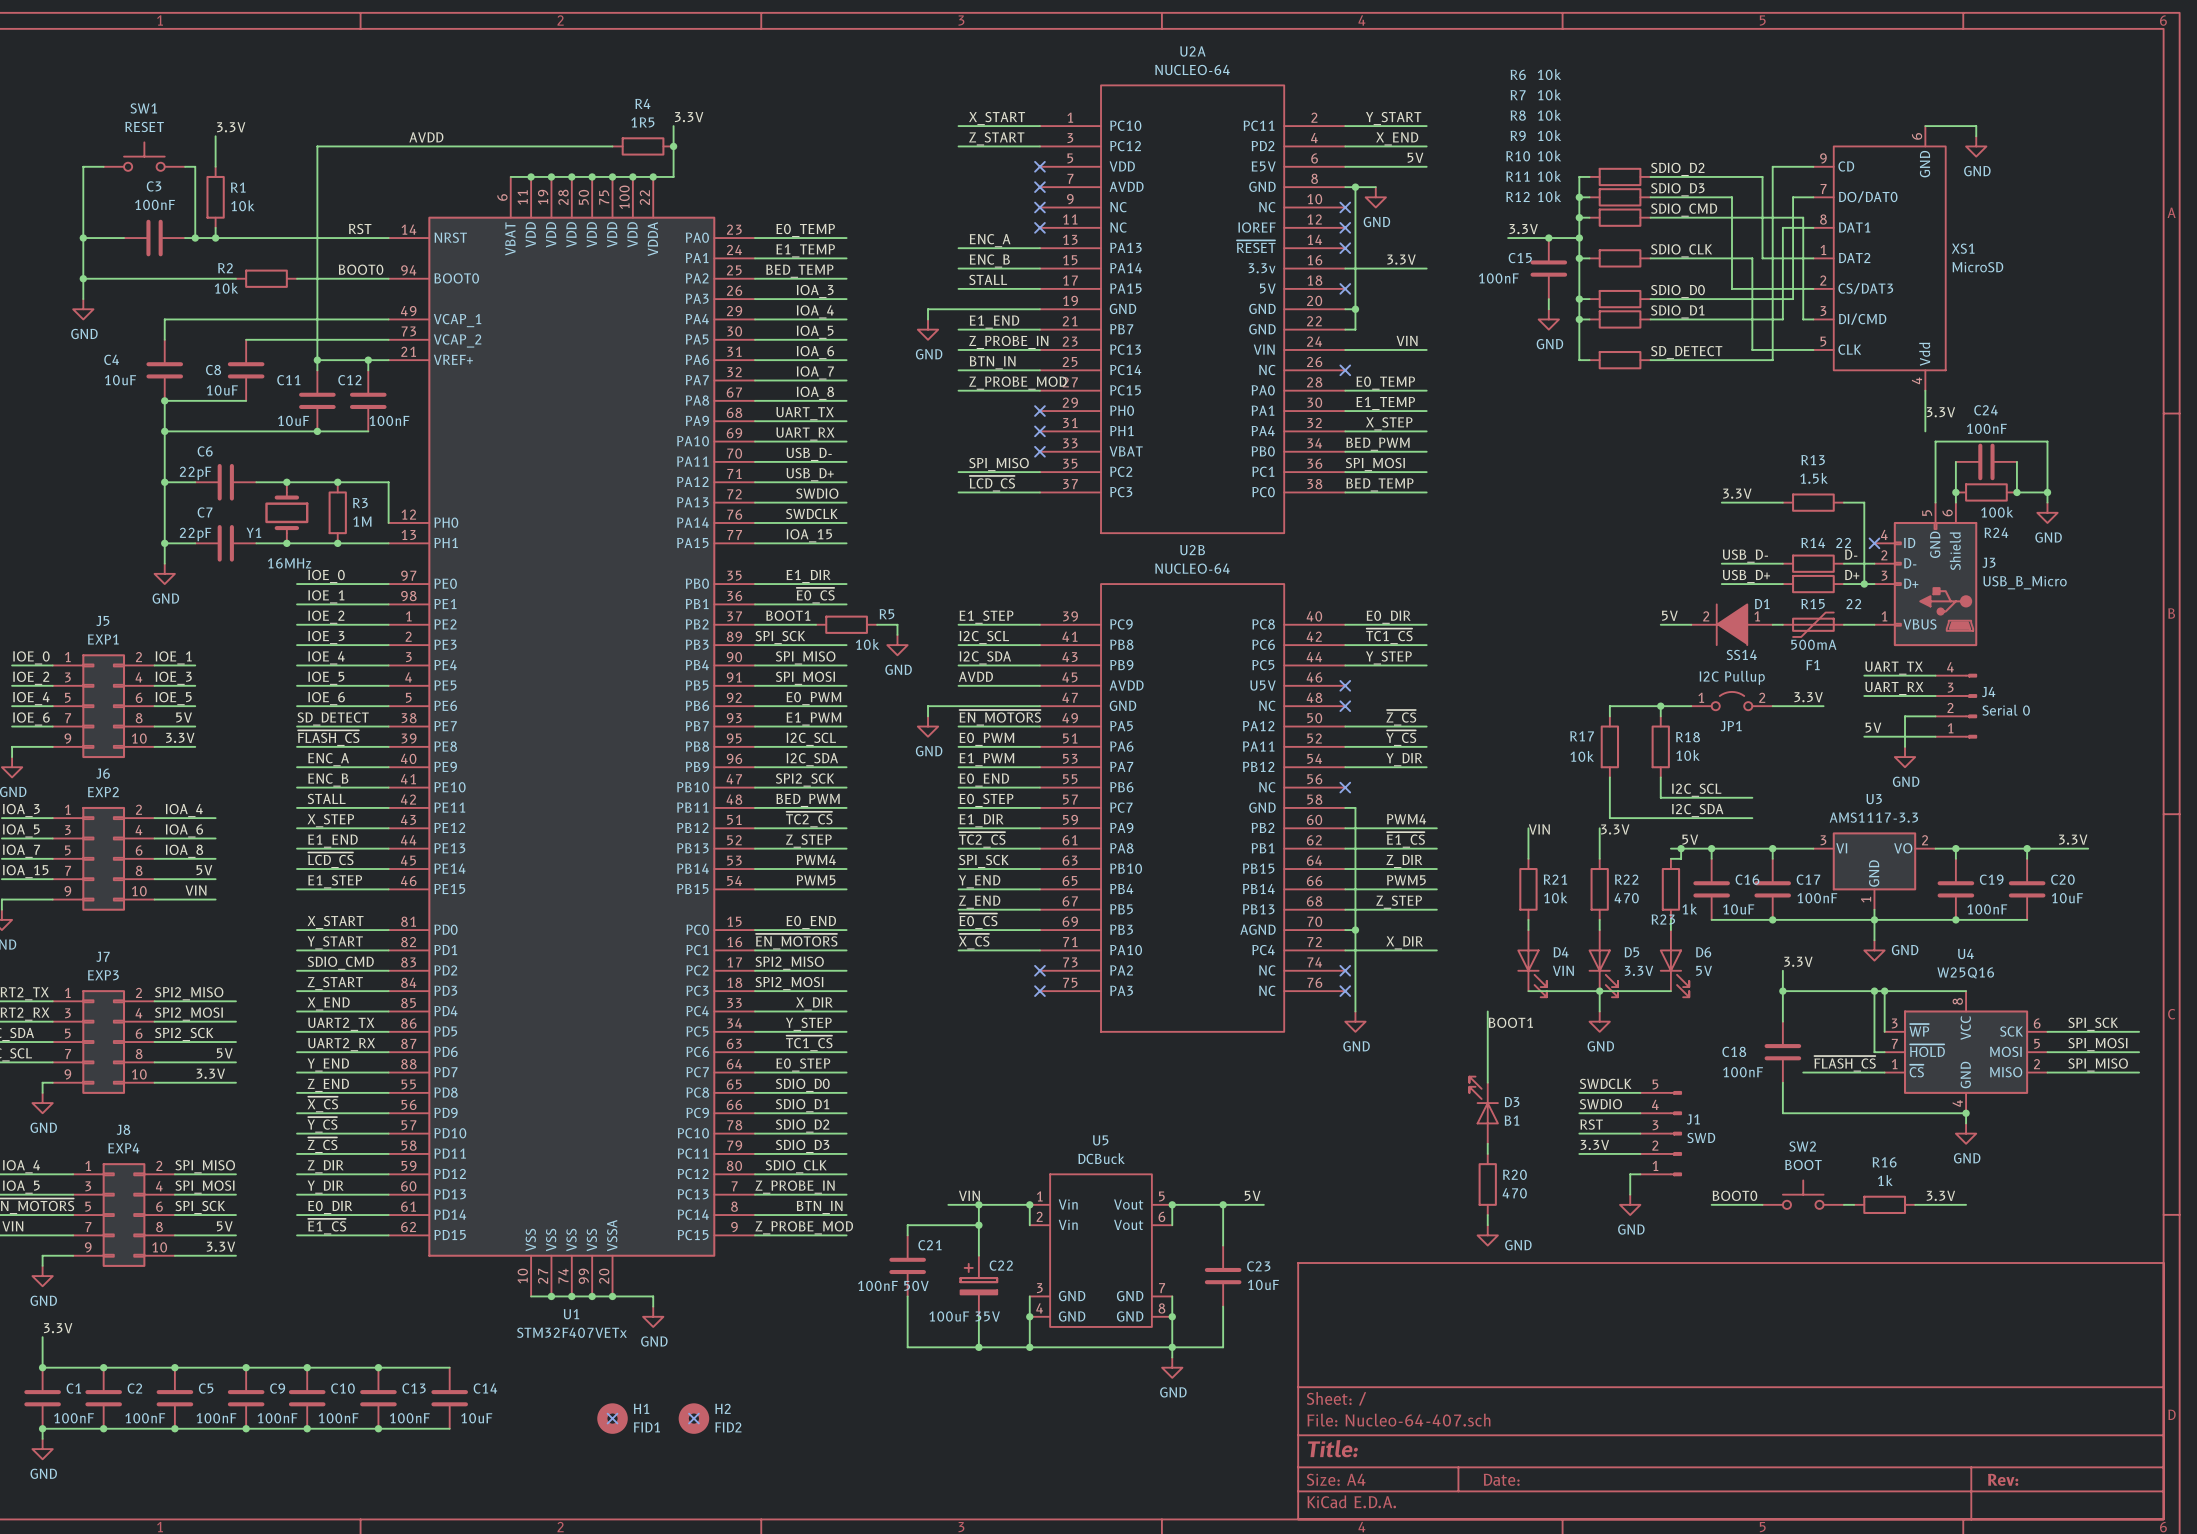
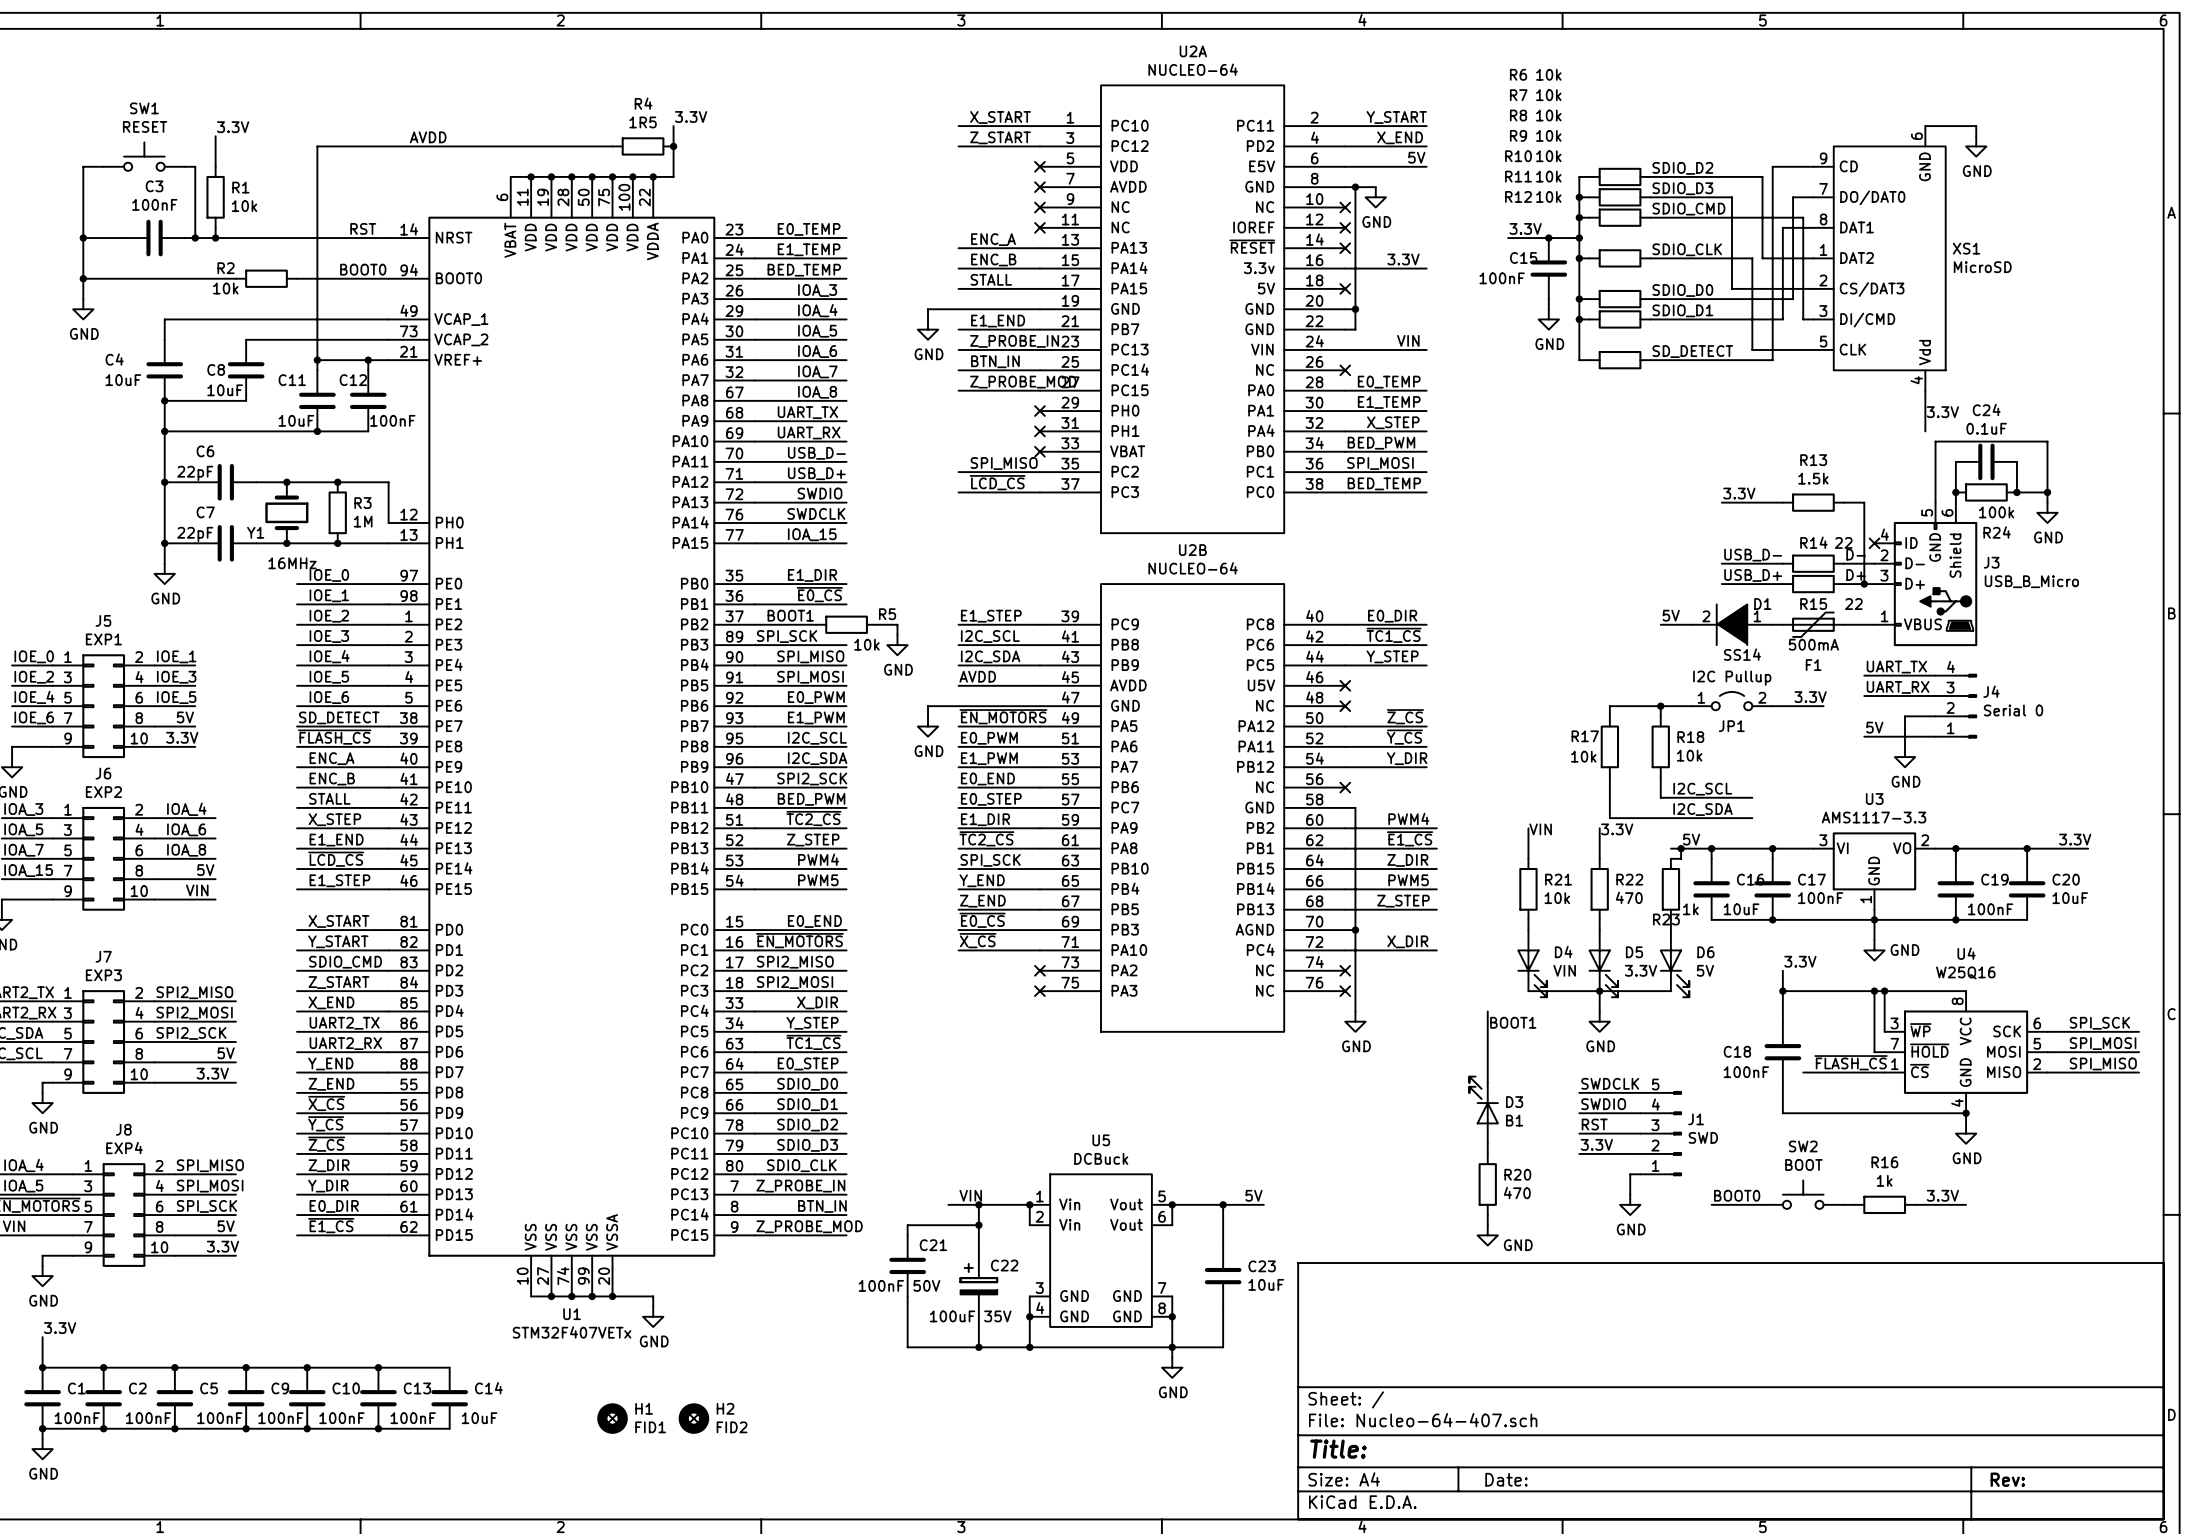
C24 value: 100nF (1986, 428) -> 0.1uF (1986, 428)

